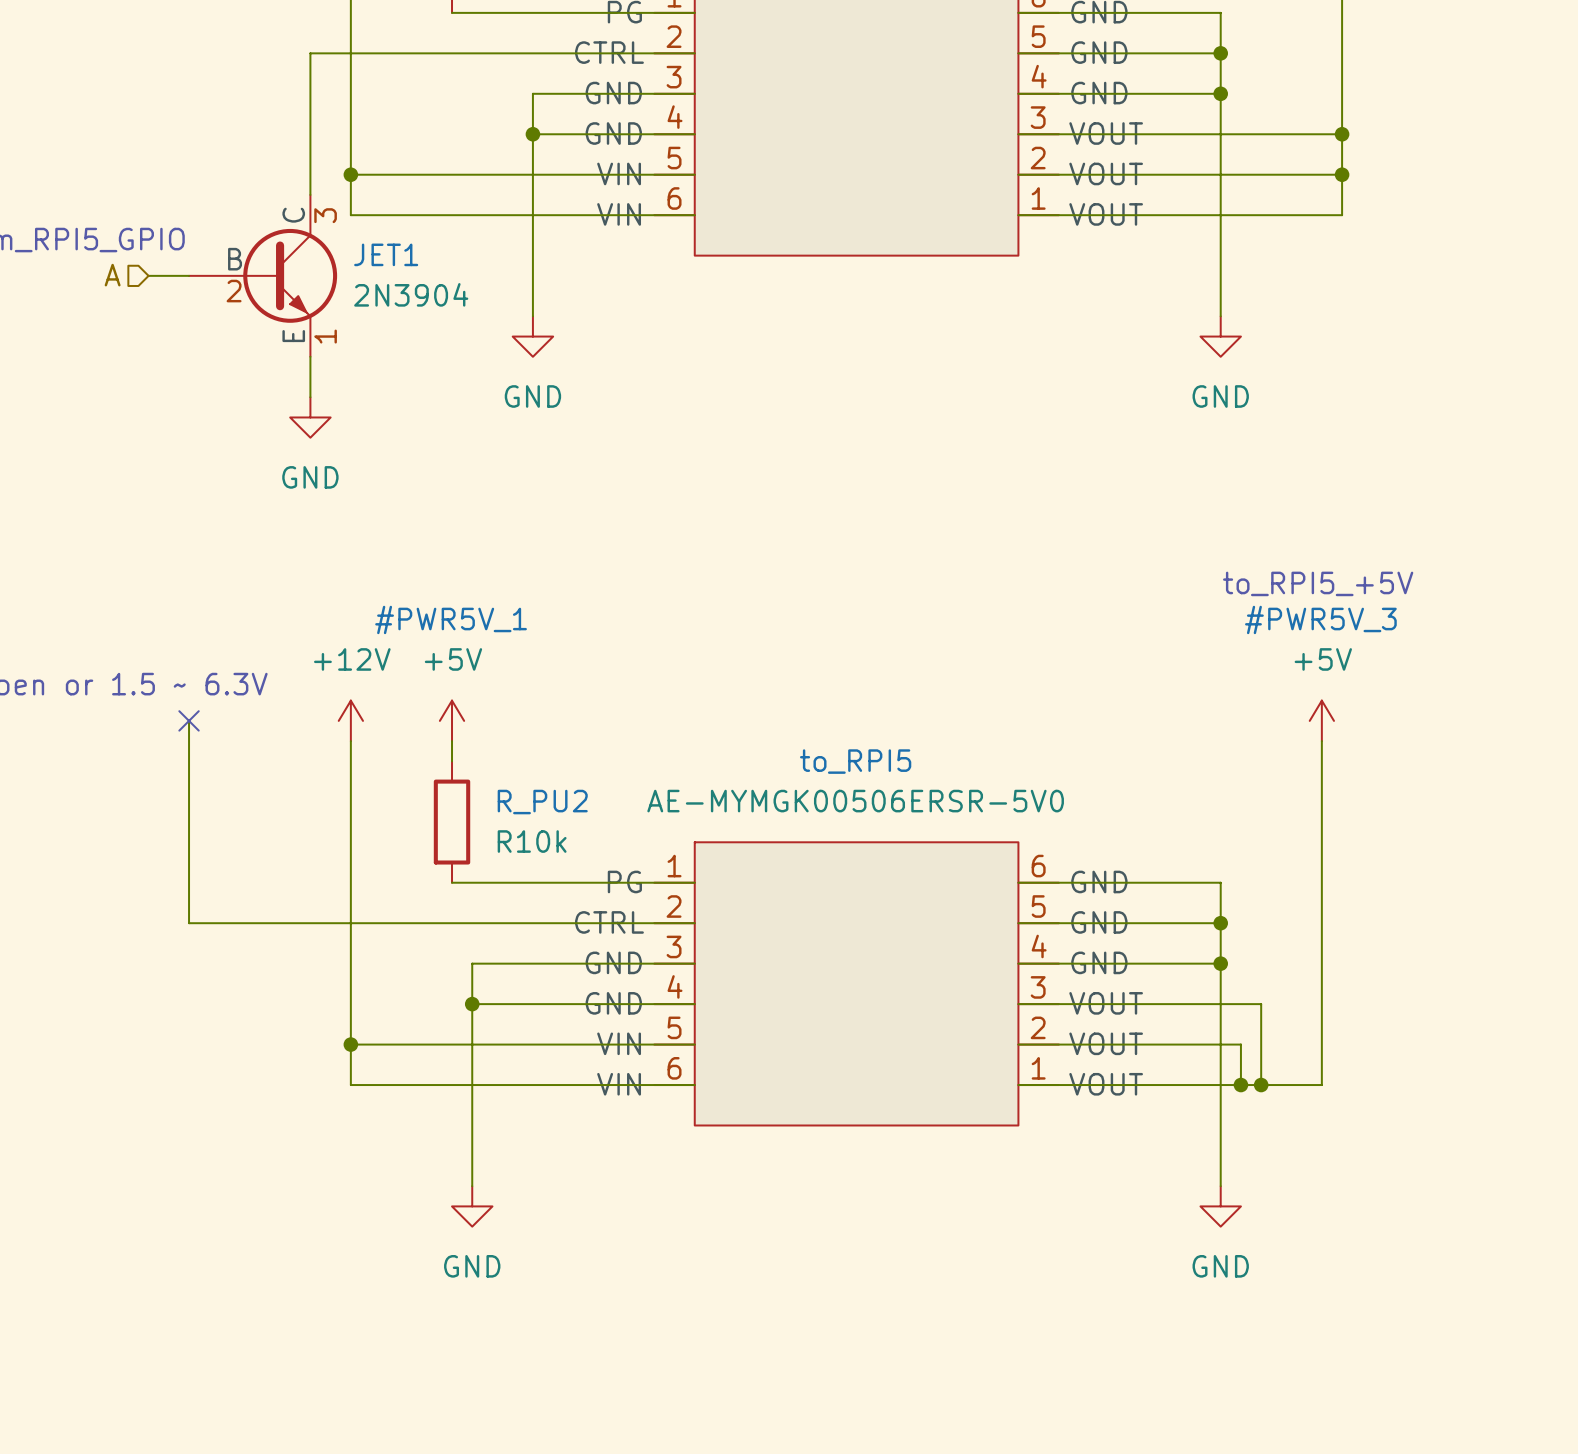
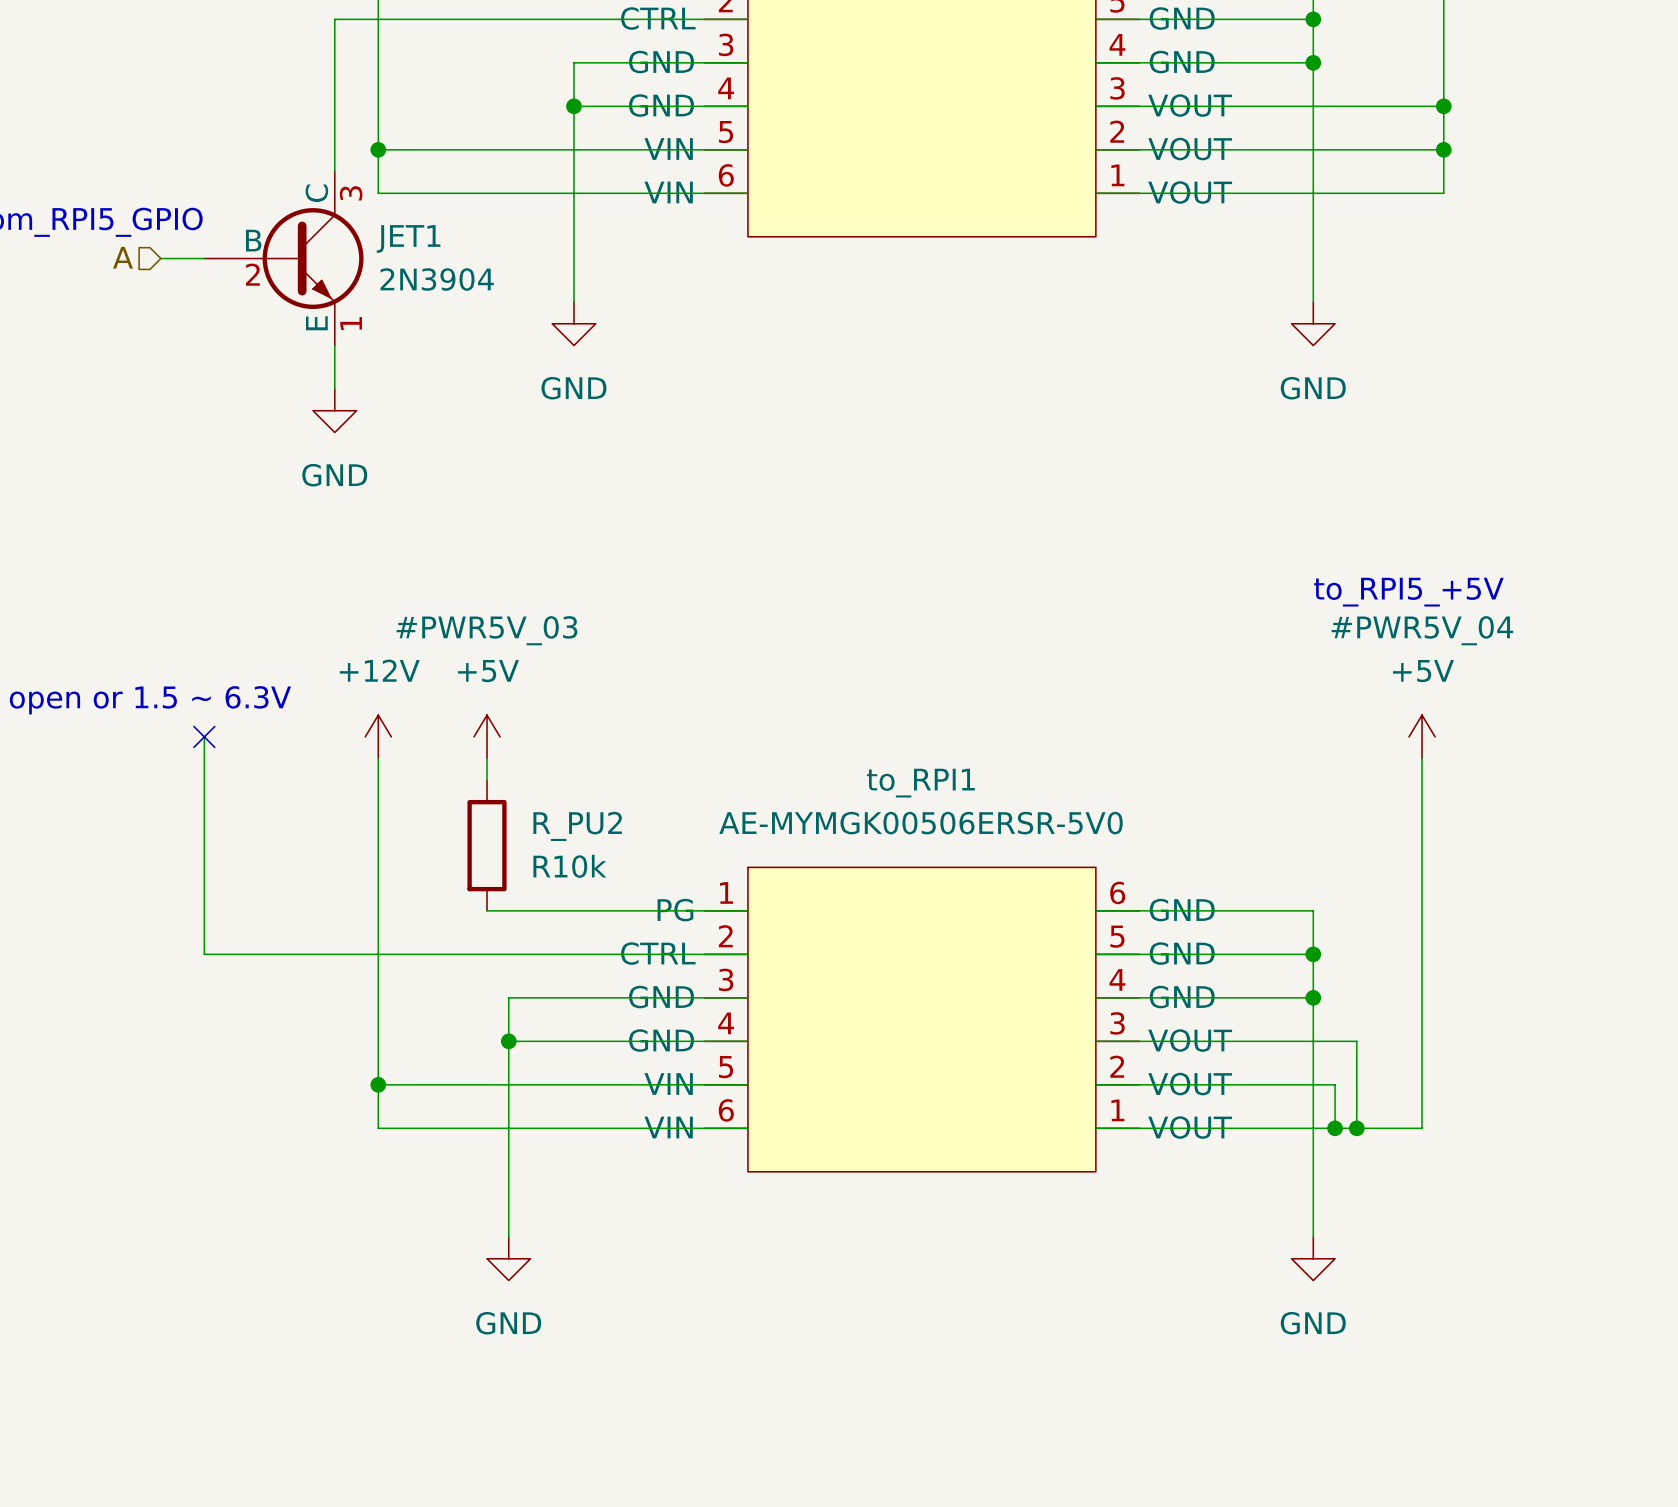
#PWR5V_1 name: #PWR5V_1 (451, 619) -> #PWR5V_03 (486, 630)
#PWR5V_3 name: #PWR5V_3 (1320, 619) -> #PWR5V_04 (1422, 630)
to_RPI5 name: to_RPI5 (855, 761) -> to_RPI1 (920, 783)

